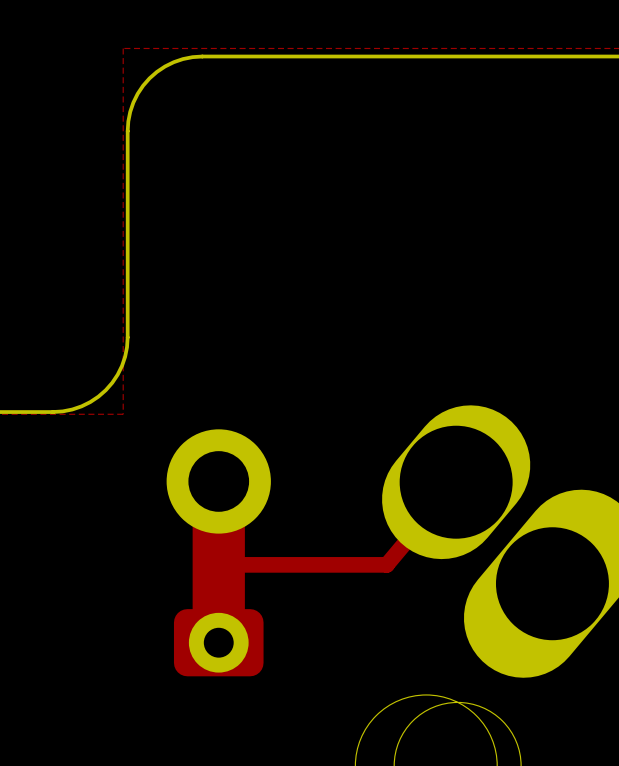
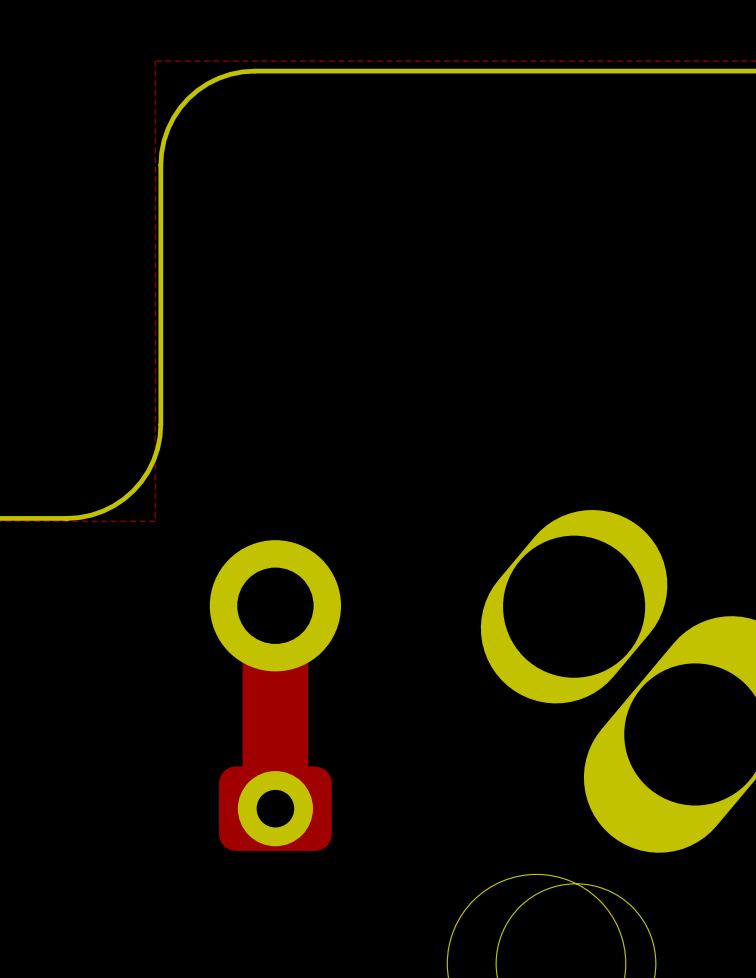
track: (456, 482) (386, 564) (218, 564) -> none

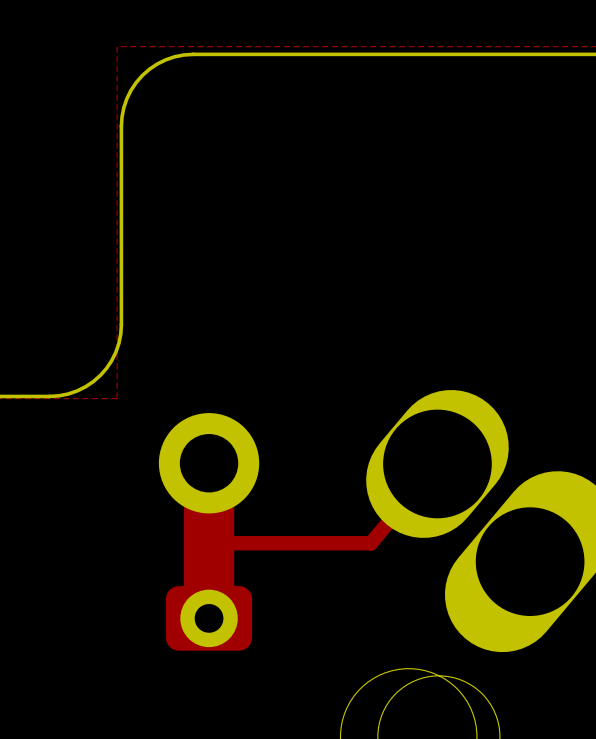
track: none -> (437, 463) (370, 543) (209, 543)

